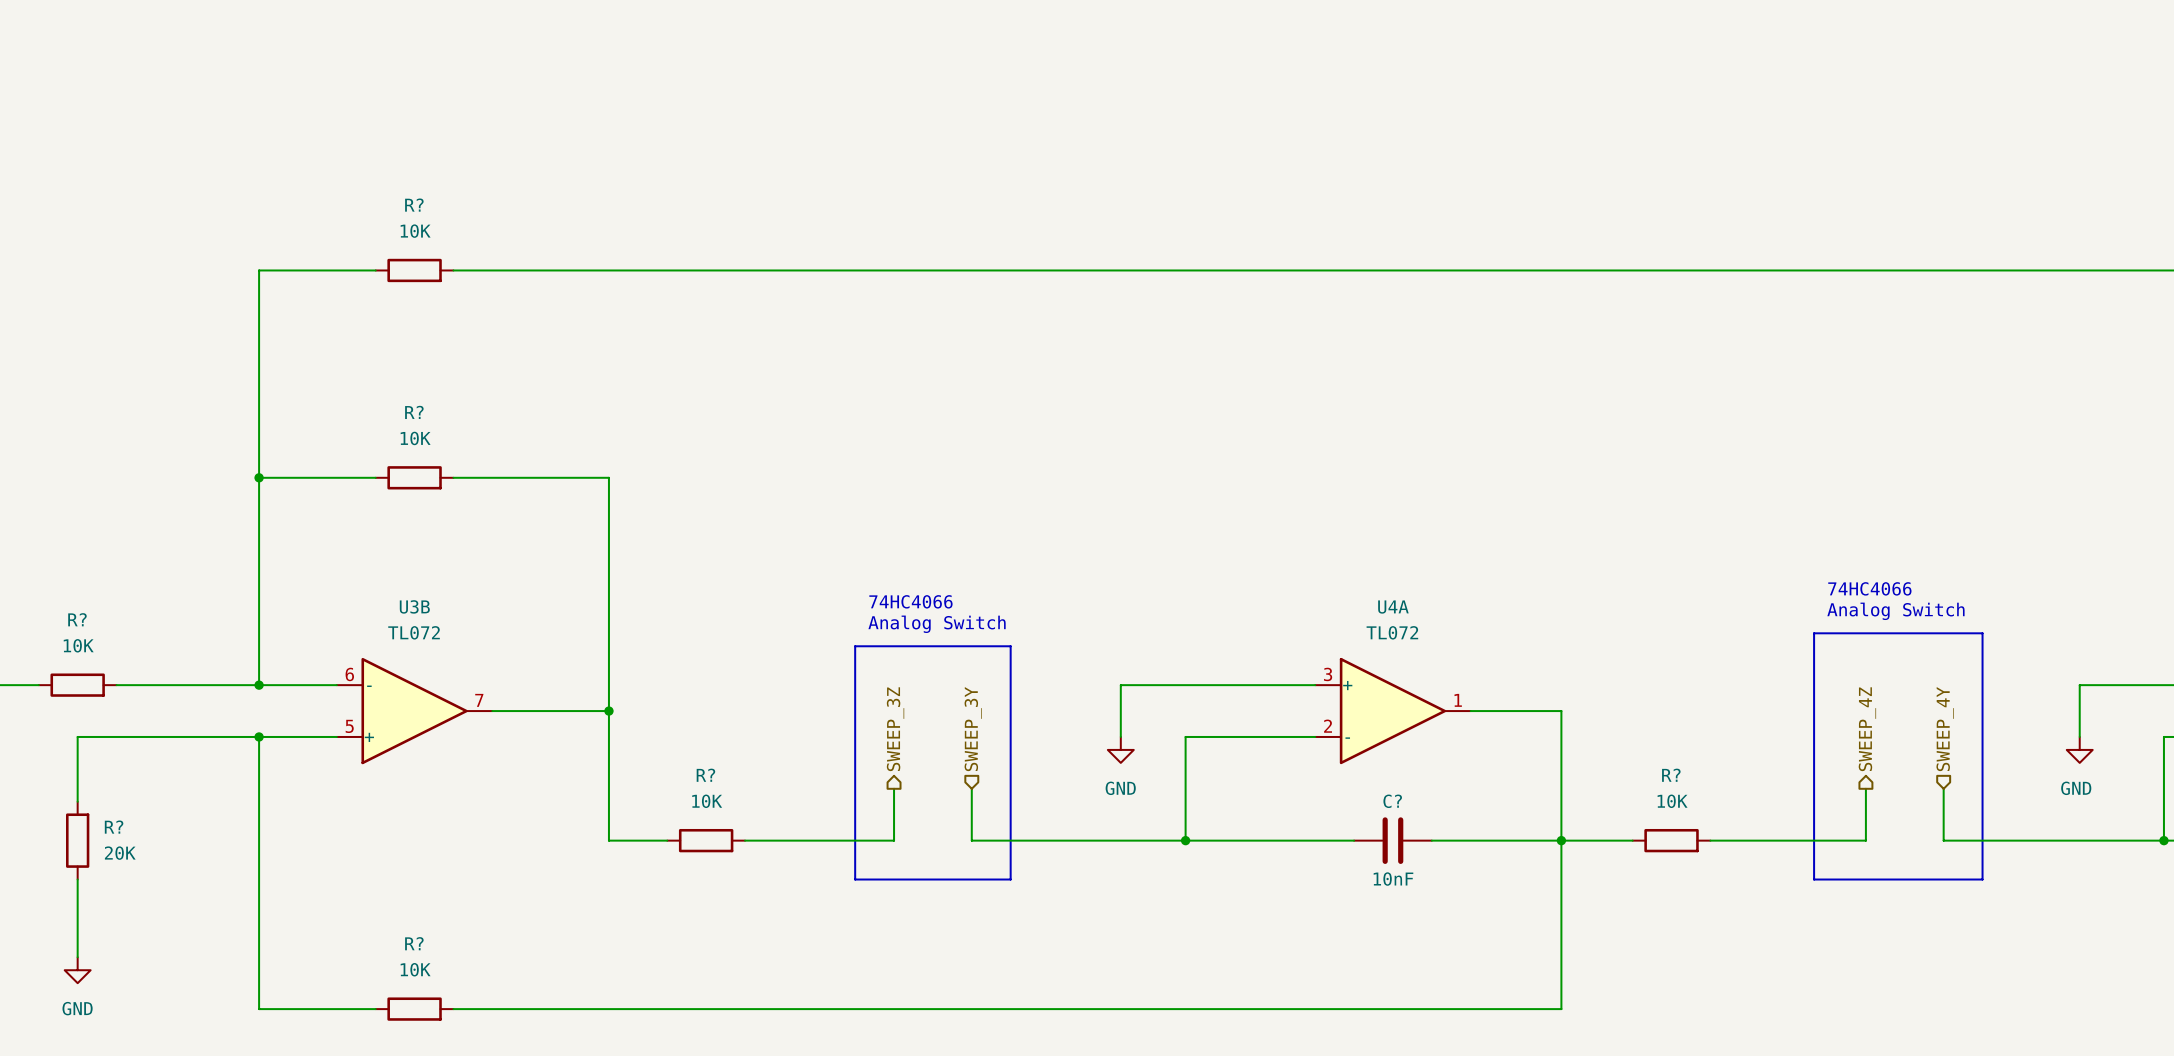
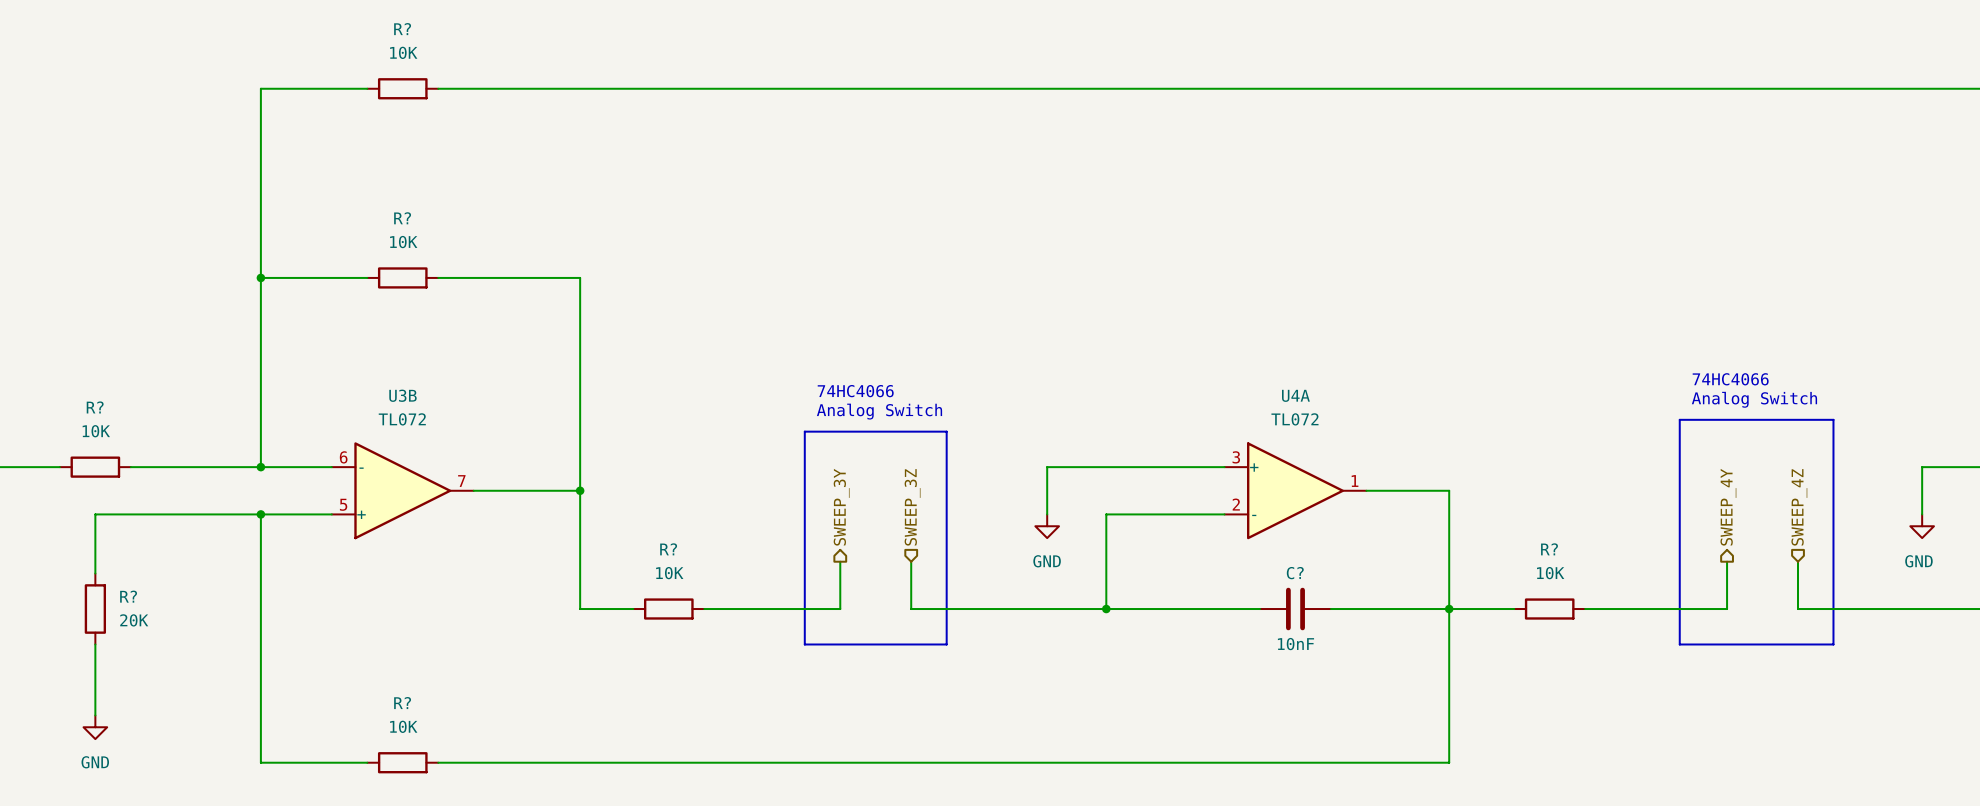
hierarchical label: SWEEP_3Z (895, 729) -> SWEEP_3Y (841, 507)
hierarchical label: SWEEP_3Y (973, 729) -> SWEEP_3Z (912, 507)
hierarchical label: SWEEP_4Z (1867, 729) -> SWEEP_4Y (1728, 507)
hierarchical label: SWEEP_4Y (1945, 729) -> SWEEP_4Z (1799, 507)

